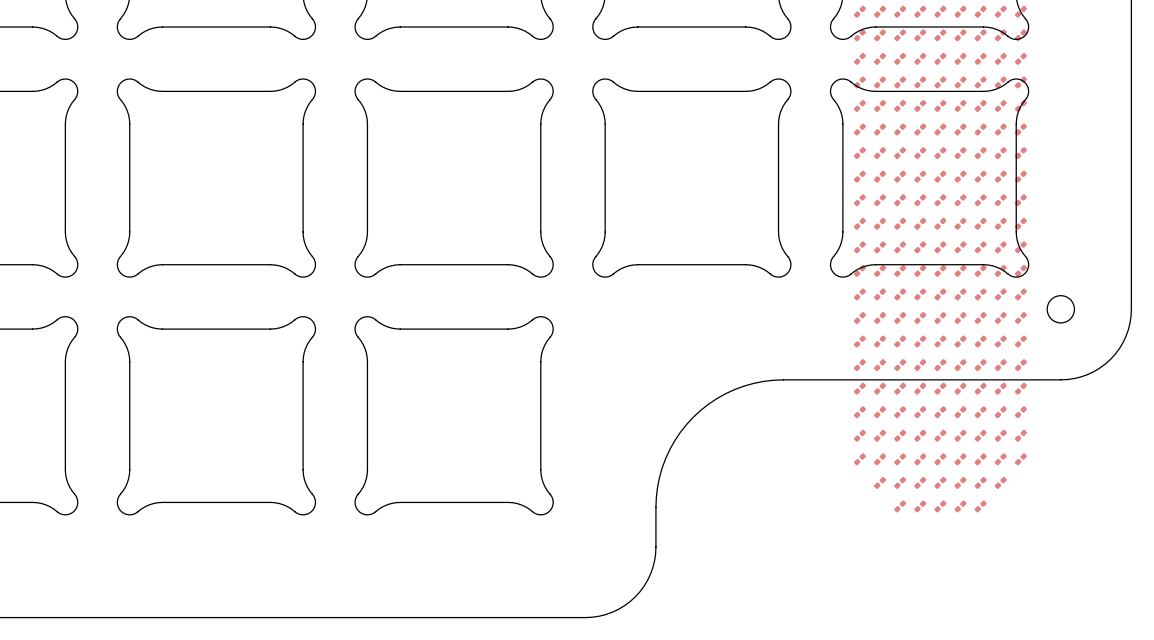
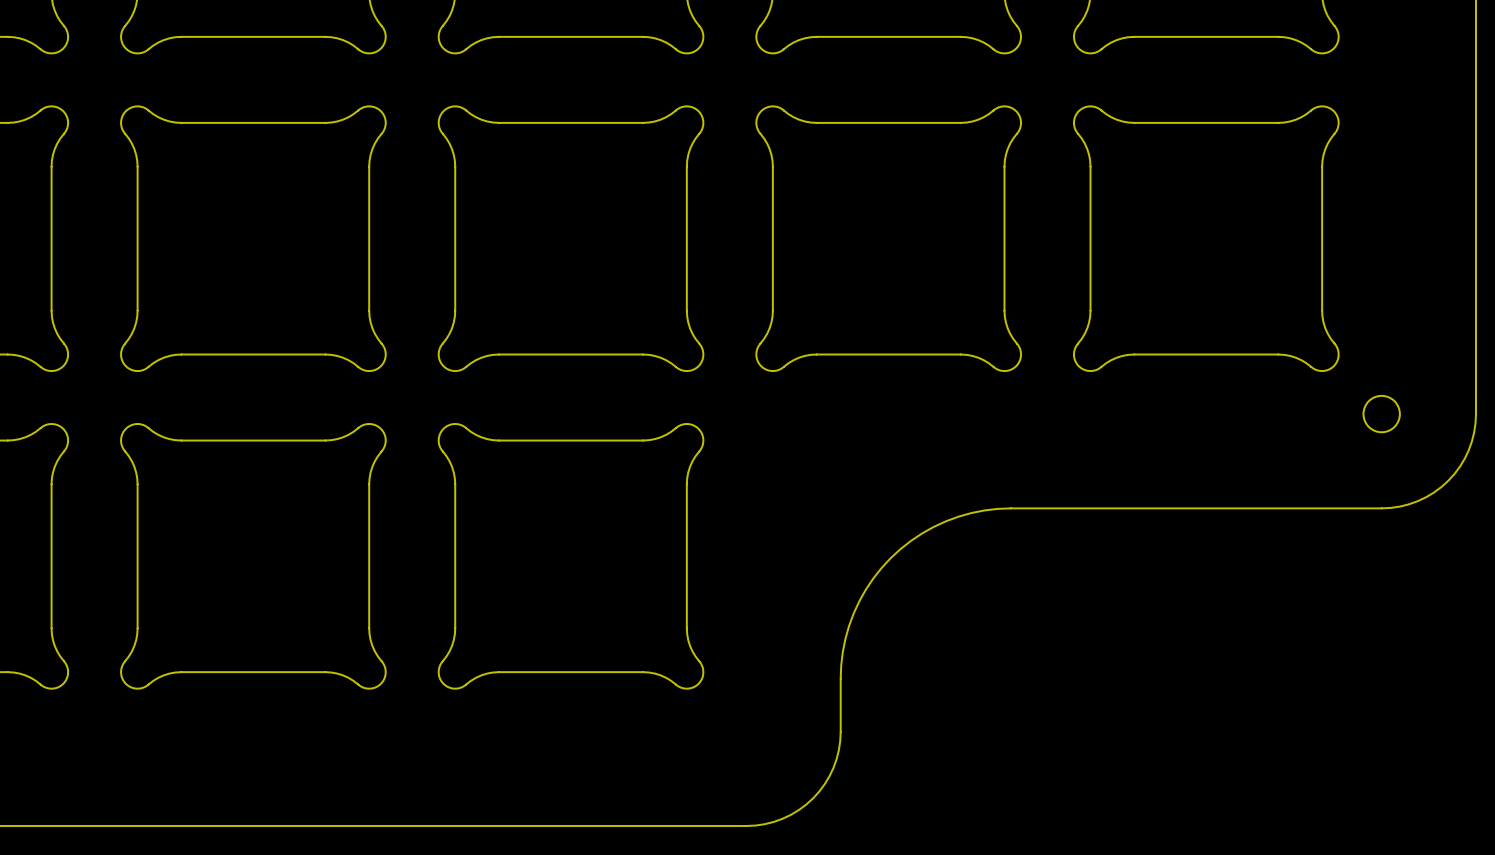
part: (859, 11) -> none
part: (880, 11) -> none
part: (900, 11) -> none
part: (920, 11) -> none
part: (940, 11) -> none
part: (960, 11) -> none
part: (980, 11) -> none
part: (1000, 11) -> none
part: (1020, 11) -> none
part: (859, 35) -> none
part: (880, 35) -> none
part: (900, 35) -> none
part: (920, 35) -> none
part: (940, 35) -> none
part: (960, 35) -> none
part: (980, 35) -> none
part: (1000, 35) -> none
part: (1020, 35) -> none
part: (859, 58) -> none
part: (880, 58) -> none
part: (900, 58) -> none
part: (920, 58) -> none
part: (940, 58) -> none
part: (960, 58) -> none
part: (980, 58) -> none
part: (1000, 58) -> none
part: (1020, 58) -> none
part: (859, 82) -> none
part: (880, 82) -> none
part: (900, 82) -> none
part: (920, 82) -> none
part: (940, 82) -> none
part: (960, 82) -> none
part: (980, 82) -> none
part: (1000, 82) -> none
part: (1020, 82) -> none
part: (859, 105) -> none
part: (880, 105) -> none
part: (900, 105) -> none
part: (920, 105) -> none
part: (940, 105) -> none
part: (960, 105) -> none
part: (980, 105) -> none
part: (1000, 105) -> none
part: (1020, 105) -> none
part: (859, 129) -> none
part: (880, 129) -> none
part: (900, 129) -> none
part: (920, 129) -> none
part: (940, 129) -> none
part: (960, 129) -> none
part: (980, 129) -> none
part: (1000, 129) -> none
part: (1020, 129) -> none
part: (859, 153) -> none
part: (880, 153) -> none
part: (900, 153) -> none
part: (920, 153) -> none
part: (940, 153) -> none
part: (960, 153) -> none
part: (980, 153) -> none
part: (1000, 153) -> none
part: (1020, 153) -> none
part: (859, 176) -> none
part: (880, 176) -> none
part: (900, 176) -> none
part: (920, 176) -> none
part: (940, 176) -> none
part: (960, 176) -> none
part: (980, 176) -> none
part: (1000, 176) -> none
part: (1020, 176) -> none
part: (859, 200) -> none
part: (880, 200) -> none
part: (900, 200) -> none
part: (920, 200) -> none
part: (940, 200) -> none
part: (960, 200) -> none
part: (980, 200) -> none
part: (1000, 200) -> none
part: (1020, 200) -> none
part: (859, 223) -> none
part: (880, 223) -> none
part: (900, 223) -> none
part: (920, 223) -> none
part: (940, 223) -> none
part: (960, 223) -> none
part: (980, 223) -> none
part: (1000, 223) -> none
part: (1020, 223) -> none
part: (859, 247) -> none
part: (880, 247) -> none
part: (900, 247) -> none
part: (920, 247) -> none
part: (940, 247) -> none
part: (960, 247) -> none
part: (980, 247) -> none
part: (1000, 247) -> none
part: (1020, 247) -> none
part: (859, 270) -> none
part: (880, 270) -> none
part: (900, 270) -> none
part: (920, 270) -> none
part: (940, 270) -> none
part: (960, 270) -> none
part: (980, 270) -> none
part: (1000, 270) -> none
part: (1020, 270) -> none
part: (859, 294) -> none
part: (880, 294) -> none
part: (900, 294) -> none
part: (920, 294) -> none
part: (940, 294) -> none
part: (960, 294) -> none
part: (980, 294) -> none
part: (1000, 294) -> none
part: (1020, 294) -> none
part: (859, 318) -> none
part: (880, 318) -> none
part: (900, 318) -> none
part: (920, 318) -> none
part: (940, 318) -> none
part: (960, 318) -> none
part: (980, 318) -> none
part: (1000, 318) -> none
part: (1020, 318) -> none
part: (859, 341) -> none
part: (880, 341) -> none
part: (900, 341) -> none
part: (920, 341) -> none
part: (940, 341) -> none
part: (960, 341) -> none
part: (980, 341) -> none
part: (1000, 341) -> none
part: (1020, 341) -> none
part: (859, 365) -> none
part: (880, 365) -> none
part: (900, 365) -> none
part: (920, 365) -> none
part: (940, 365) -> none
part: (960, 365) -> none
part: (980, 365) -> none
part: (1000, 365) -> none
part: (1020, 365) -> none
part: (859, 388) -> none
part: (880, 388) -> none
part: (900, 388) -> none
part: (920, 388) -> none
part: (940, 388) -> none
part: (960, 388) -> none
part: (980, 388) -> none
part: (1000, 388) -> none
part: (1020, 388) -> none
part: (859, 412) -> none
part: (880, 412) -> none
part: (900, 412) -> none
part: (920, 412) -> none
part: (940, 412) -> none
part: (960, 412) -> none
part: (980, 412) -> none
part: (1000, 412) -> none
part: (1020, 412) -> none
part: (859, 435) -> none
part: (880, 435) -> none
part: (900, 435) -> none
part: (920, 435) -> none
part: (940, 435) -> none
part: (960, 435) -> none
part: (980, 435) -> none
part: (1000, 435) -> none
part: (1020, 435) -> none
part: (859, 459) -> none
part: (880, 459) -> none
part: (900, 459) -> none
part: (920, 459) -> none
part: (940, 459) -> none
part: (960, 459) -> none
part: (980, 459) -> none
part: (1000, 459) -> none
part: (1020, 459) -> none
part: (880, 482) -> none
part: (900, 482) -> none
part: (920, 482) -> none
part: (940, 482) -> none
part: (960, 482) -> none
part: (980, 482) -> none
part: (1000, 482) -> none
part: (900, 506) -> none
part: (920, 506) -> none
part: (940, 506) -> none
part: (960, 506) -> none
part: (980, 506) -> none

